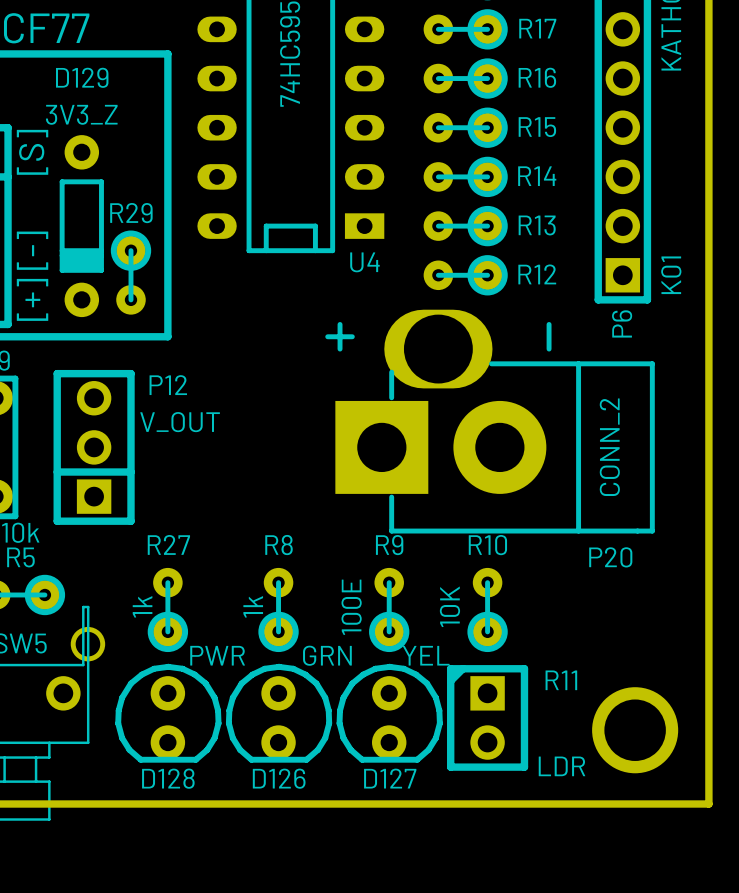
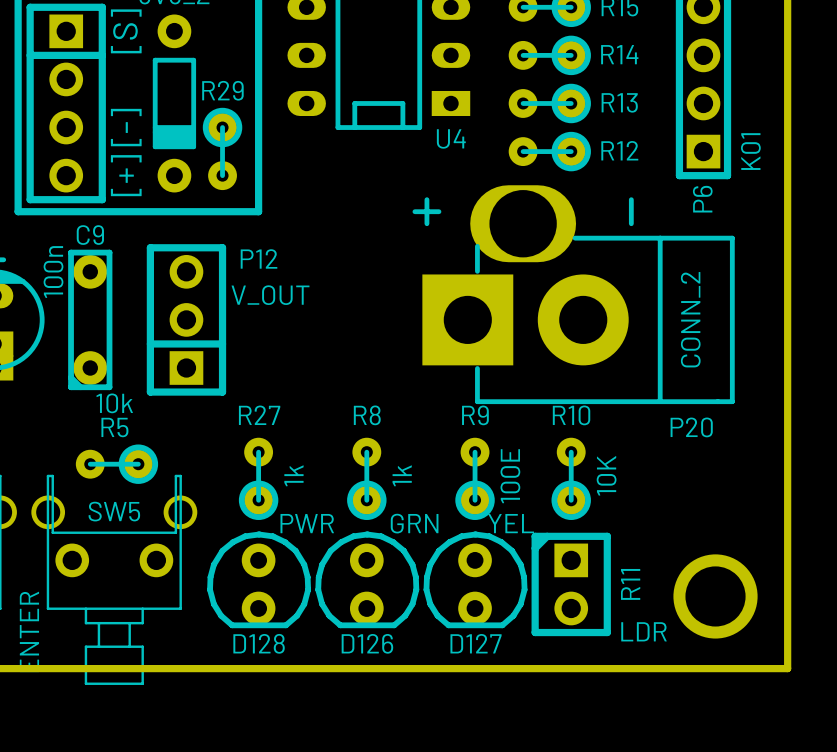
R27 value position: 1k (142, 606) -> 1k (293, 475)
R8 value position: 1k (253, 606) -> 1k (402, 475)
R10 value position: 10K (449, 606) -> 10K (606, 475)
R9 value position: 100E (351, 607) -> 100E (510, 476)
R11 name rotation: 0° (561, 680) -> 90° counterclockwise (630, 584)

